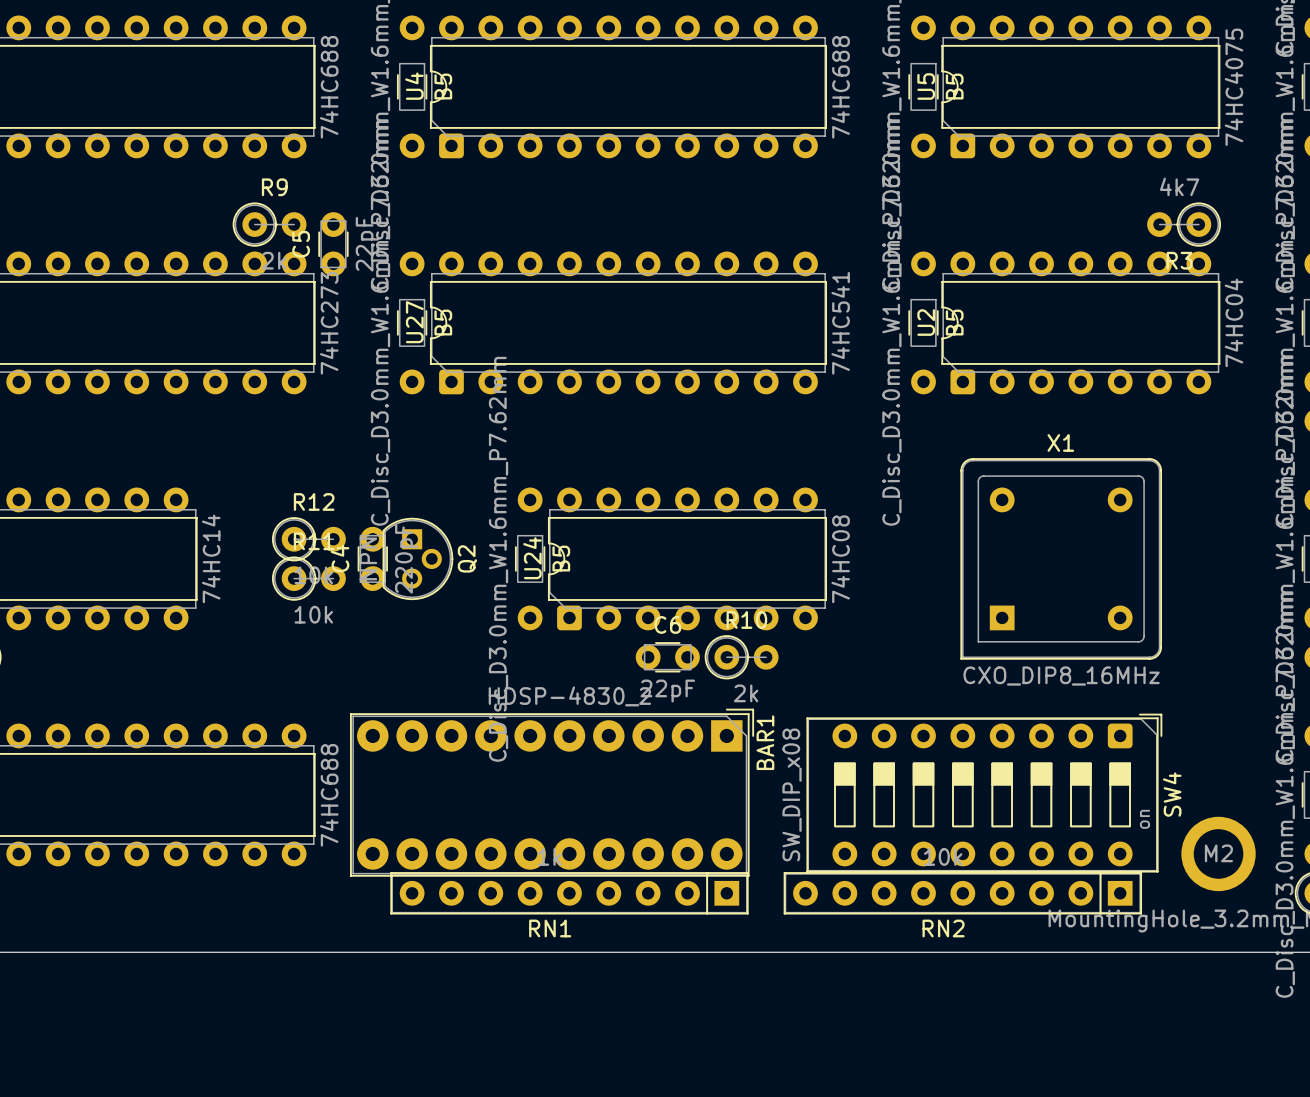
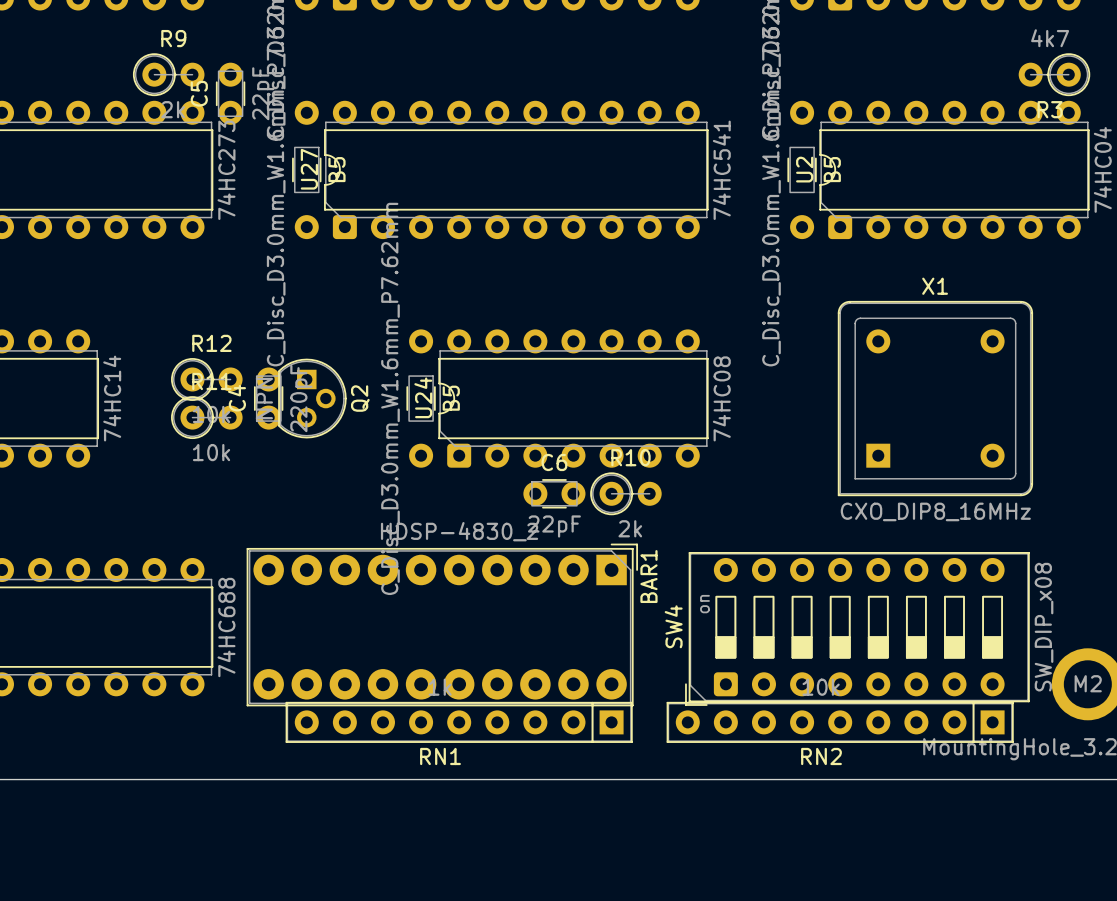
SW4 rotation: 0° (984, 793) -> 180° (857, 628)

